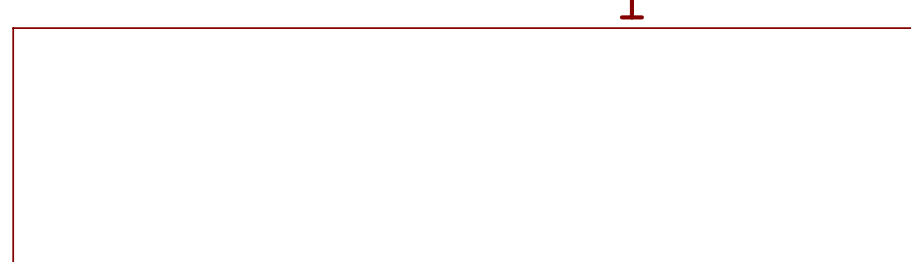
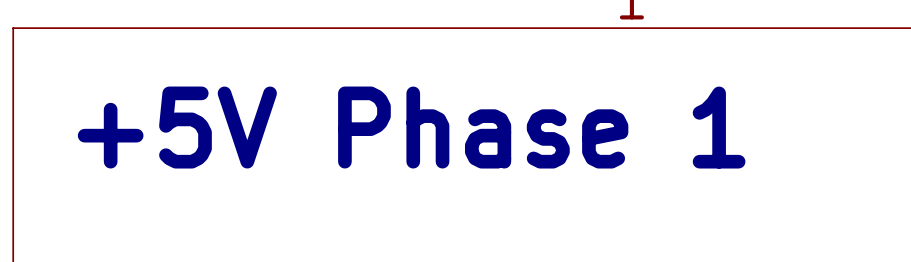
text: none -> +5V Phase 1 (411, 127)

